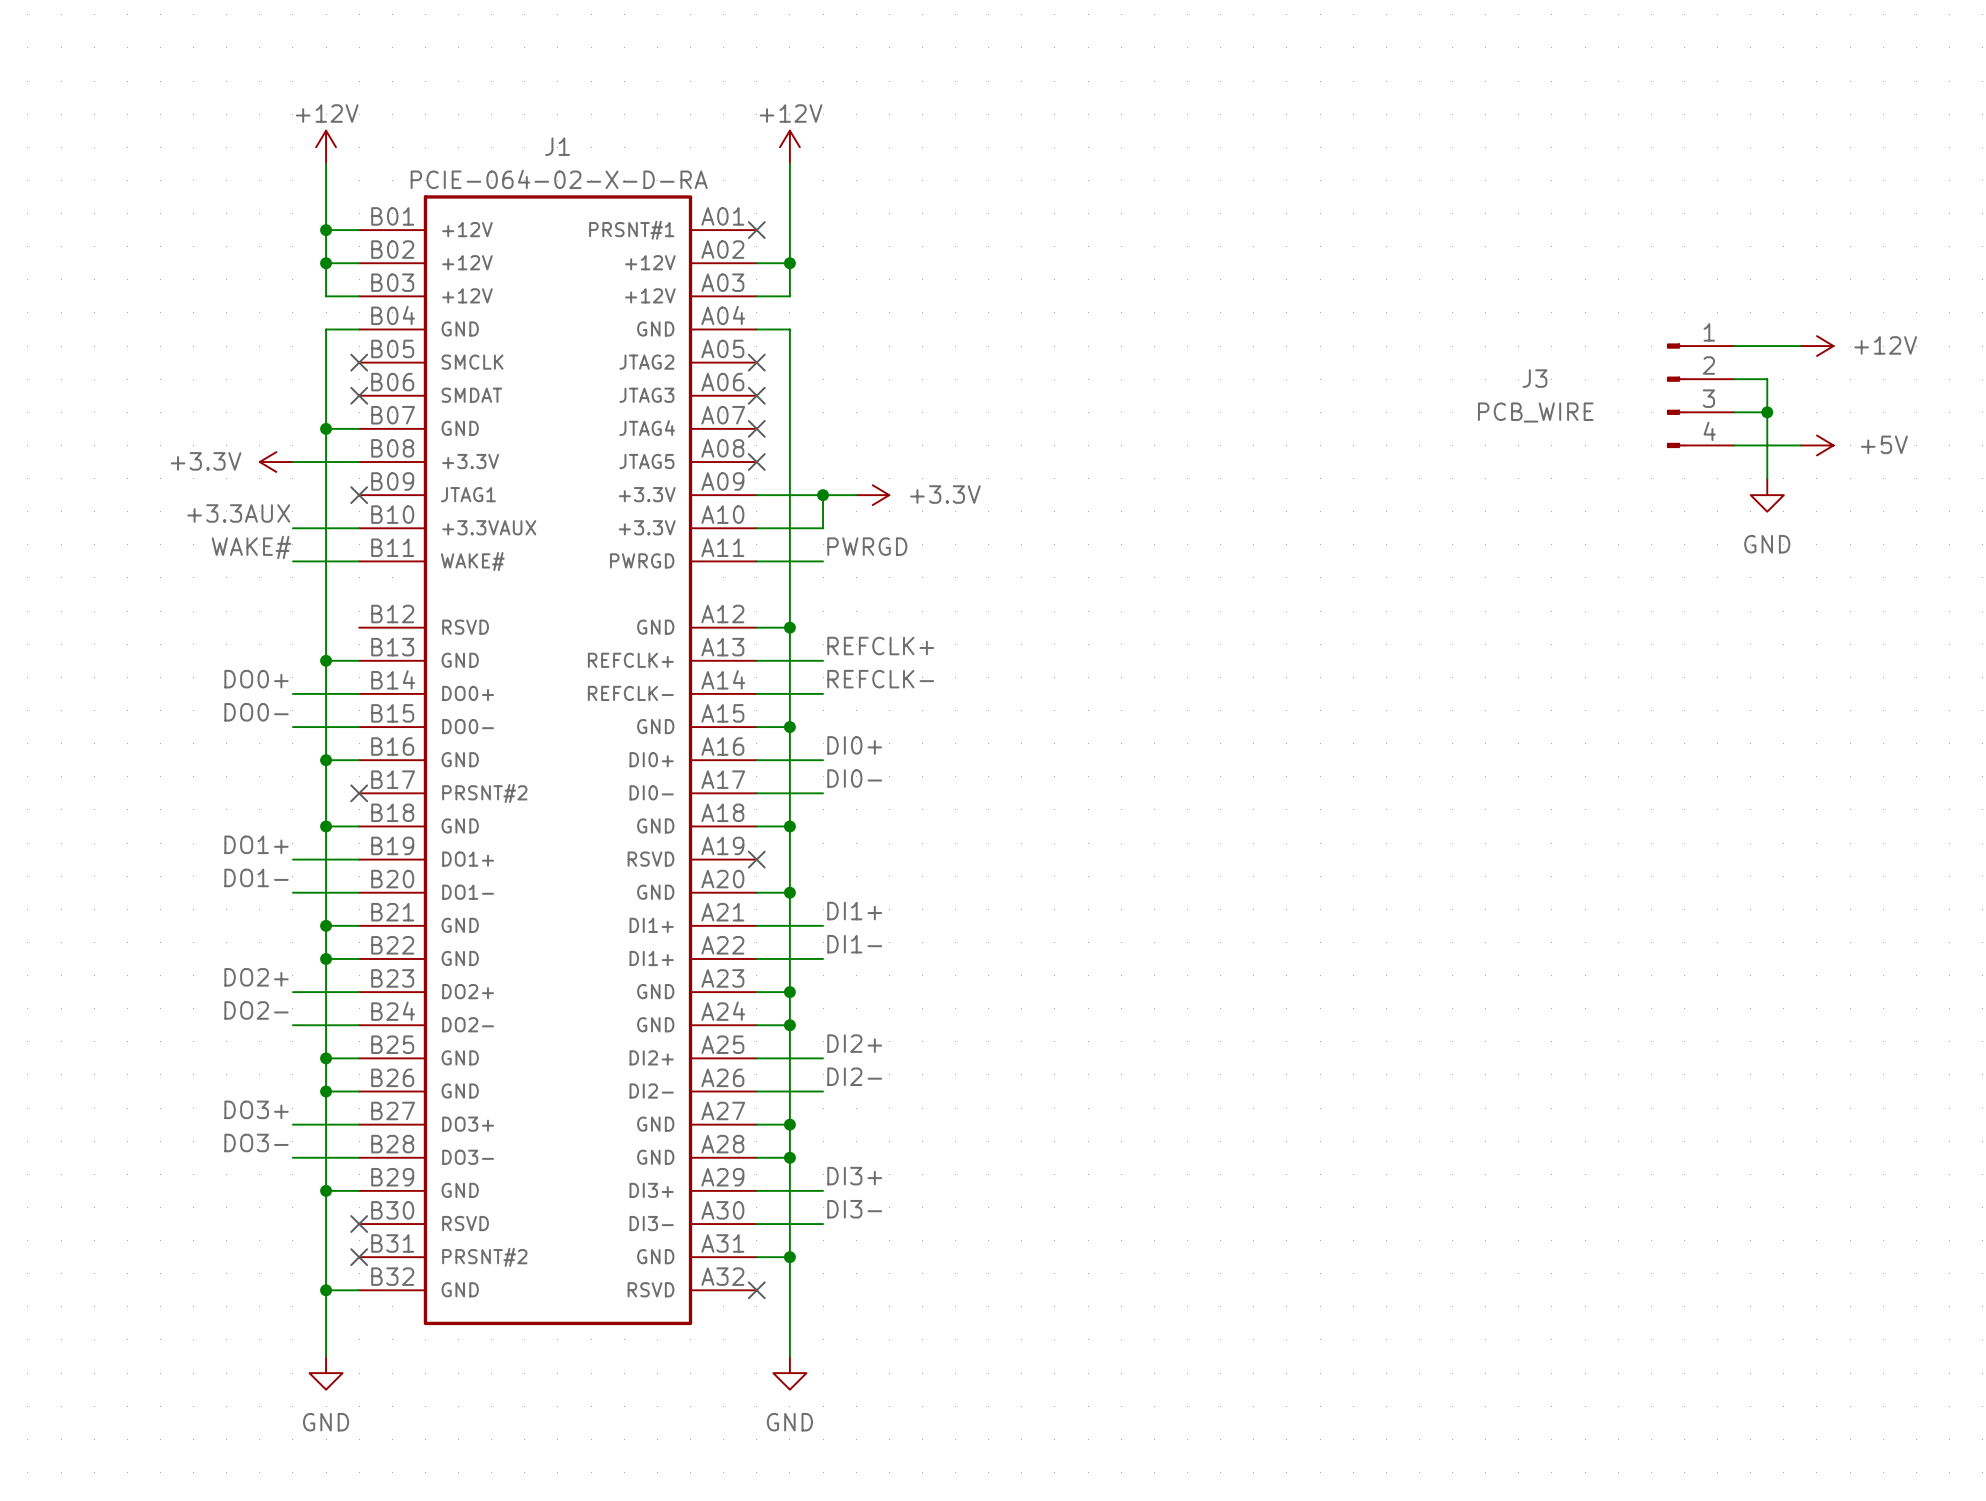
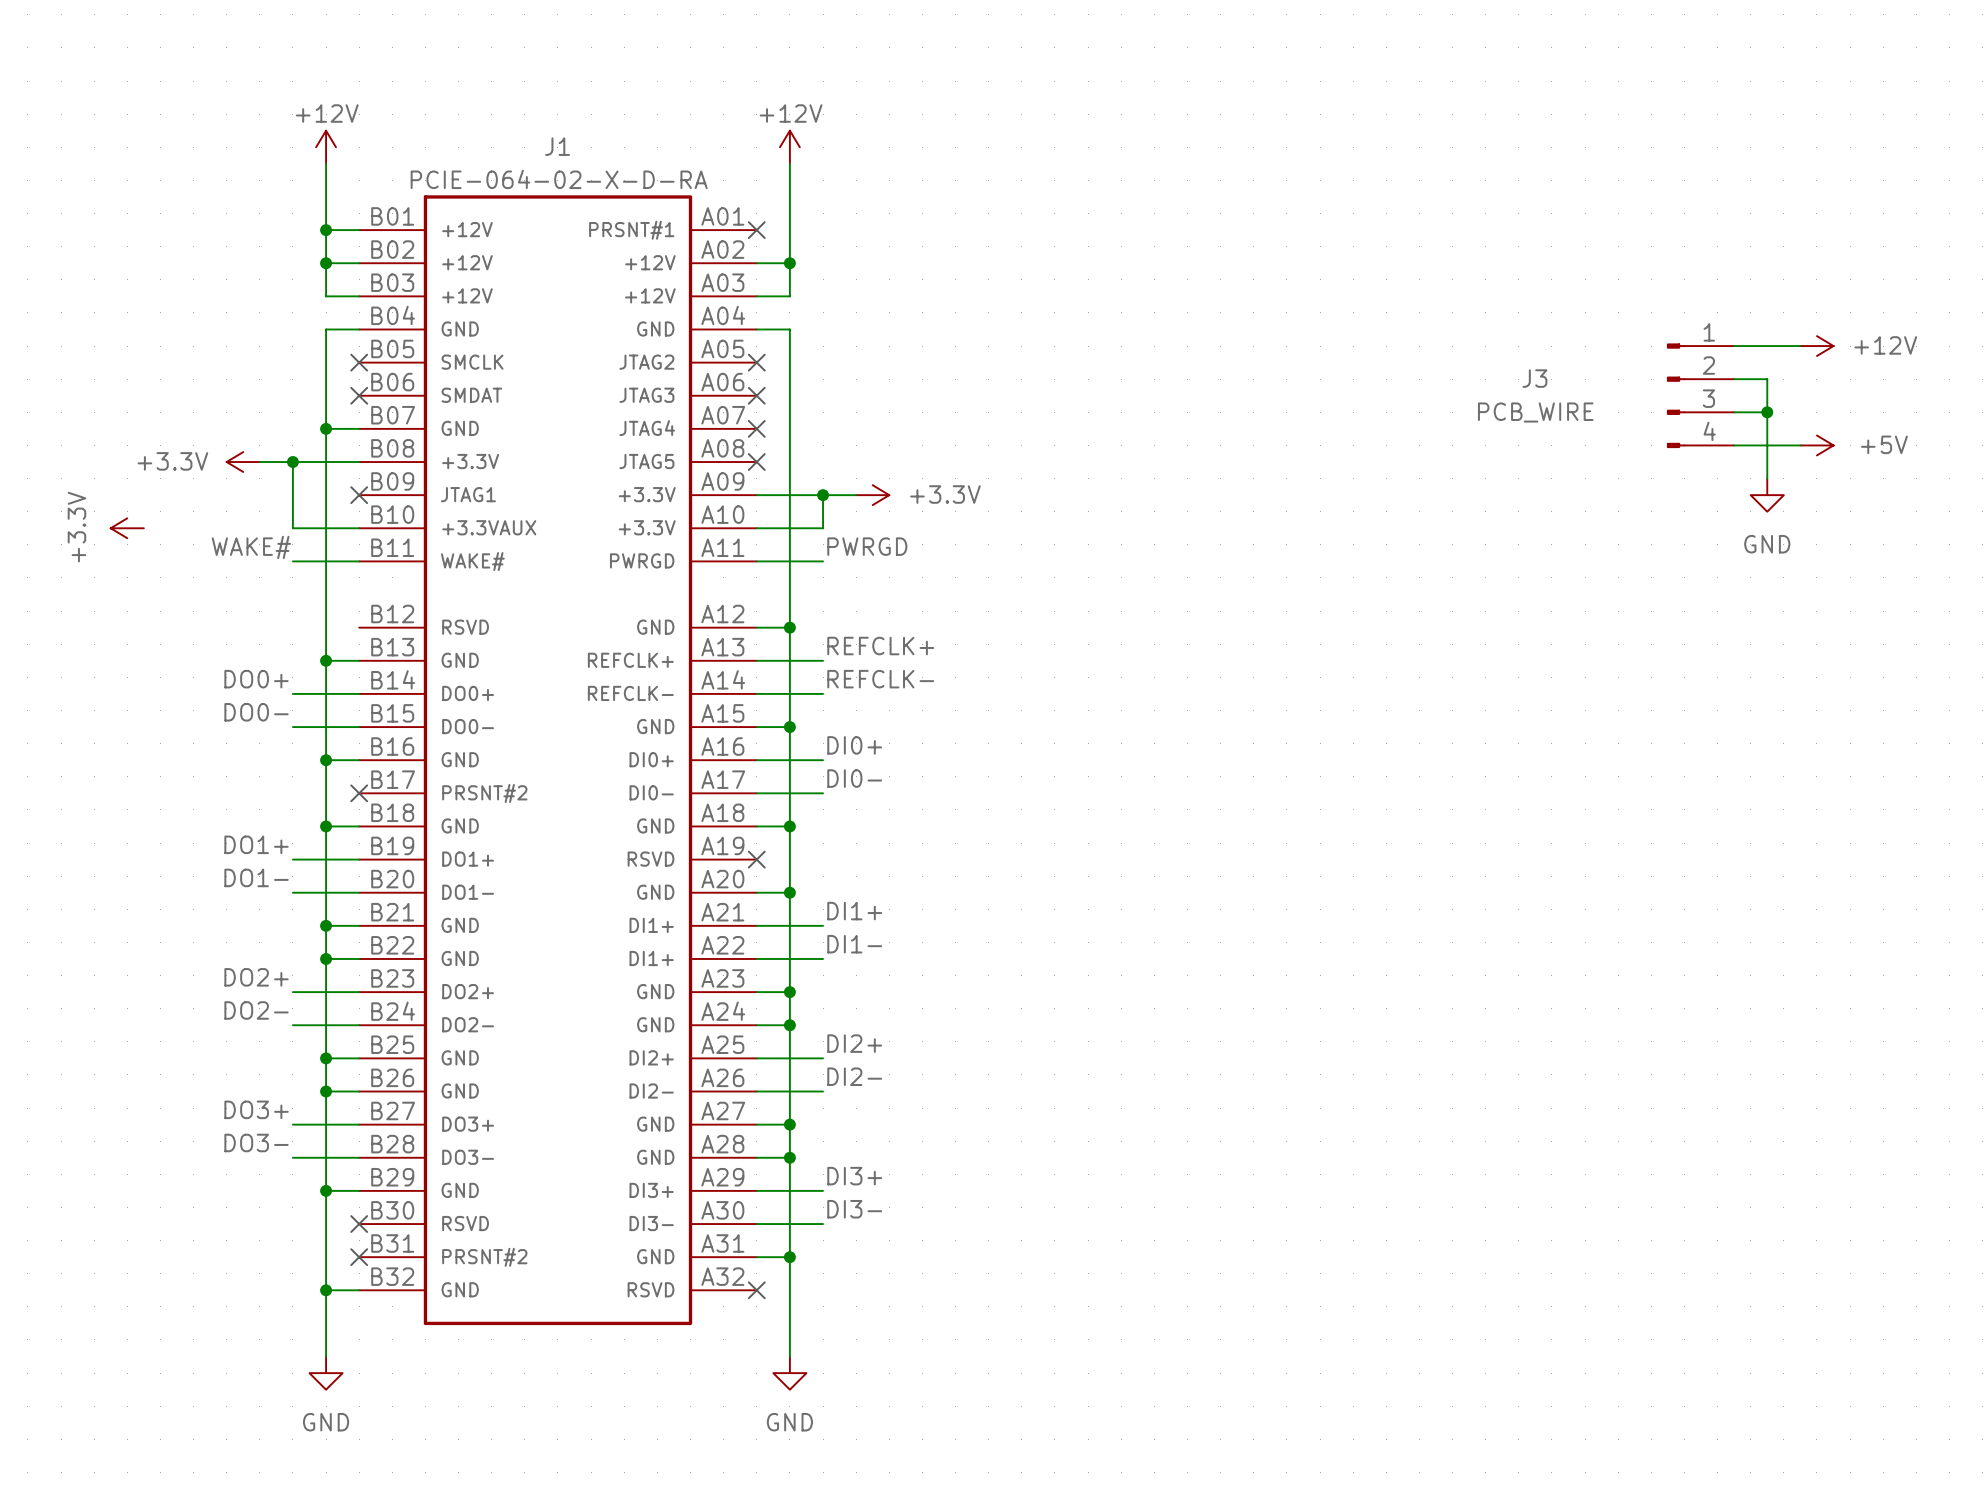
wire: none -> (259, 462) (292, 462) (292, 528)
power symbol position: +3.3V (276, 462) -> +3.3V (243, 462)
junction: none -> (292, 462)
label: +3.3AUX (238, 513) -> none
power symbol: none -> +3.3V (127, 528)

